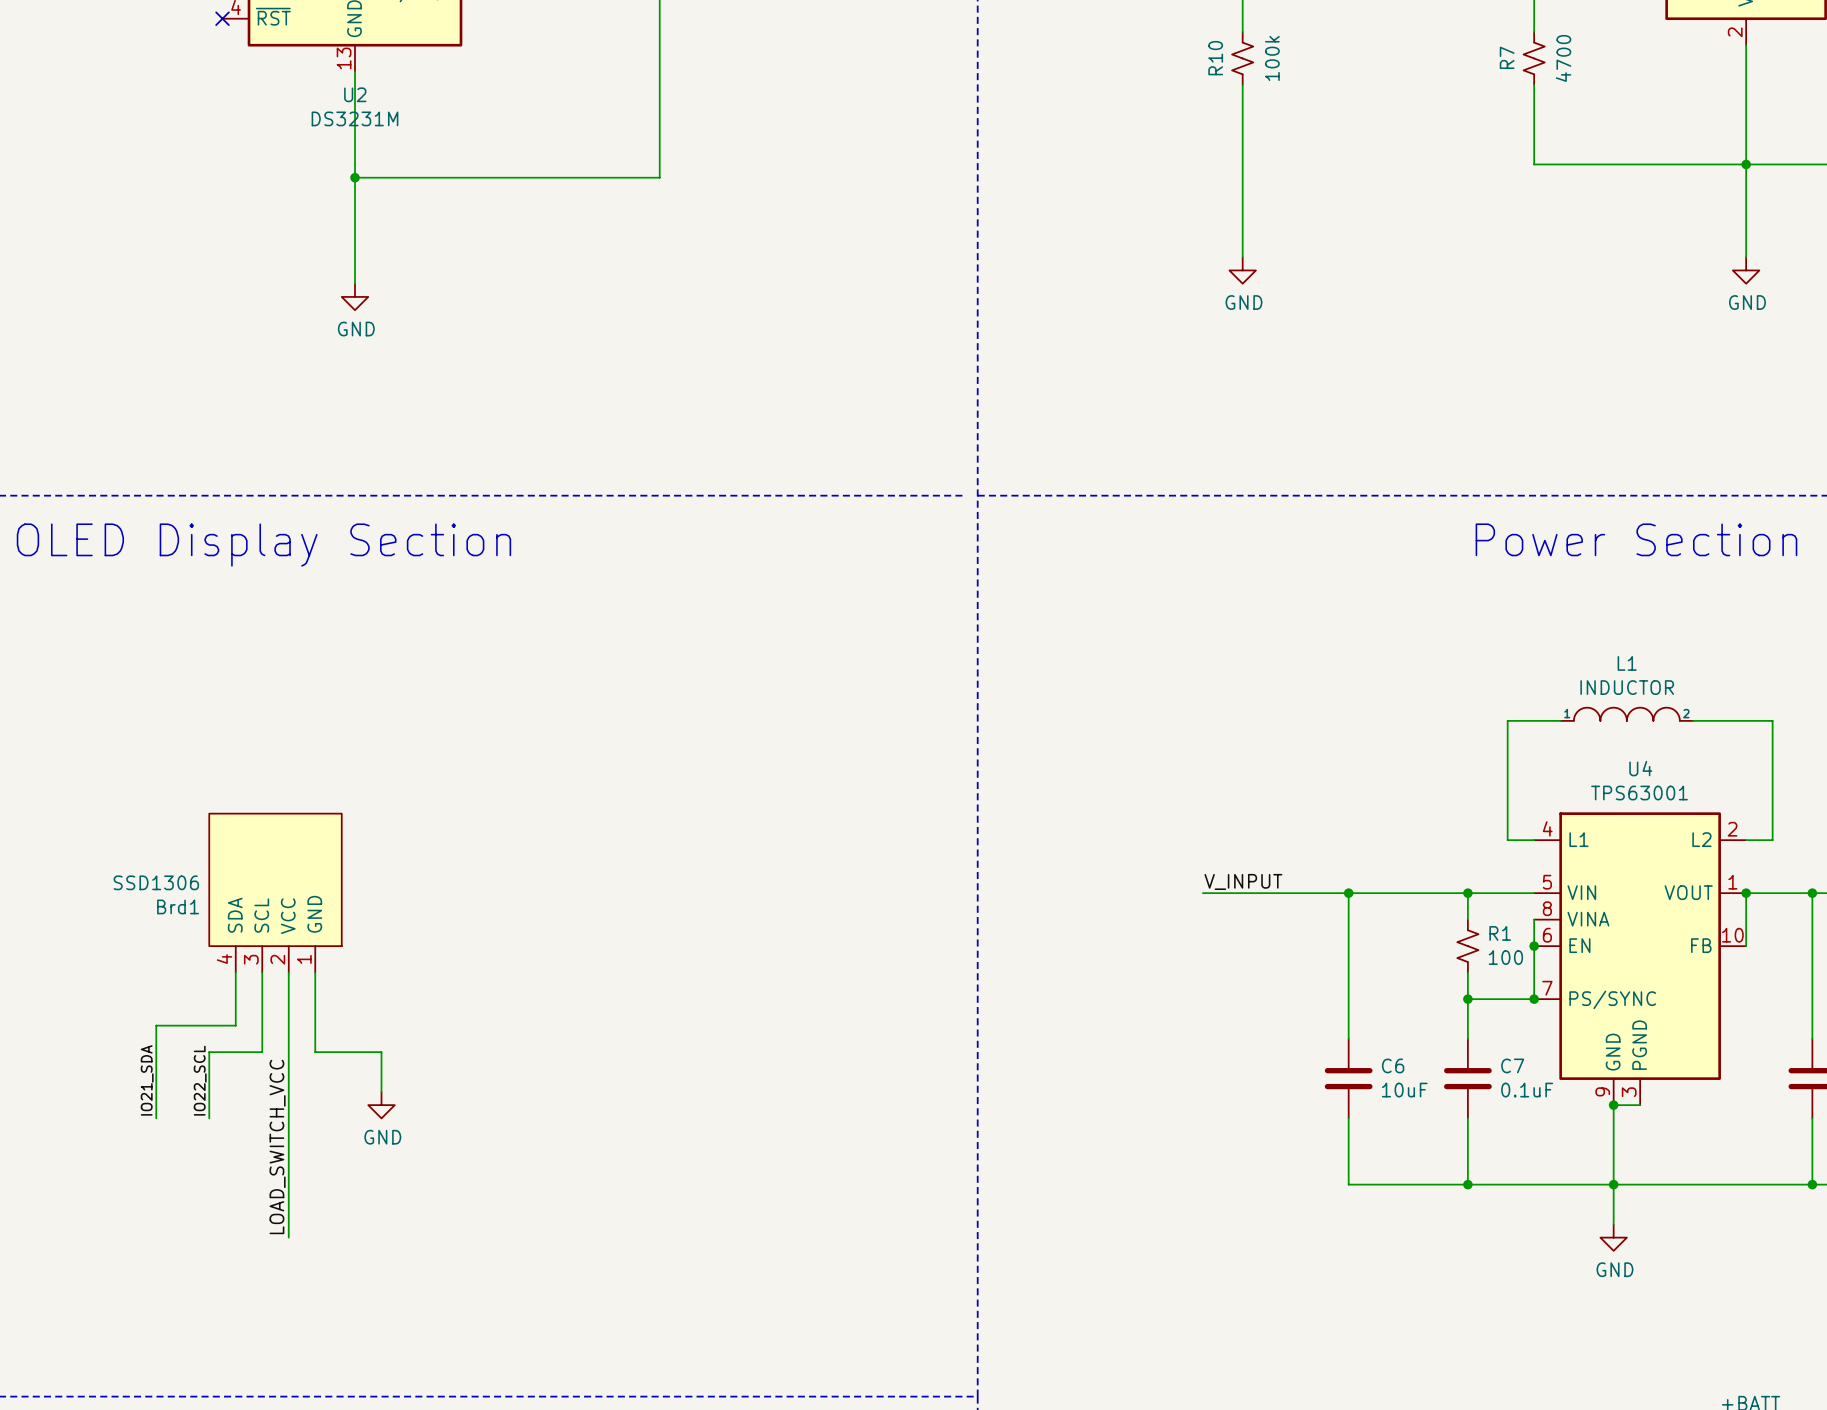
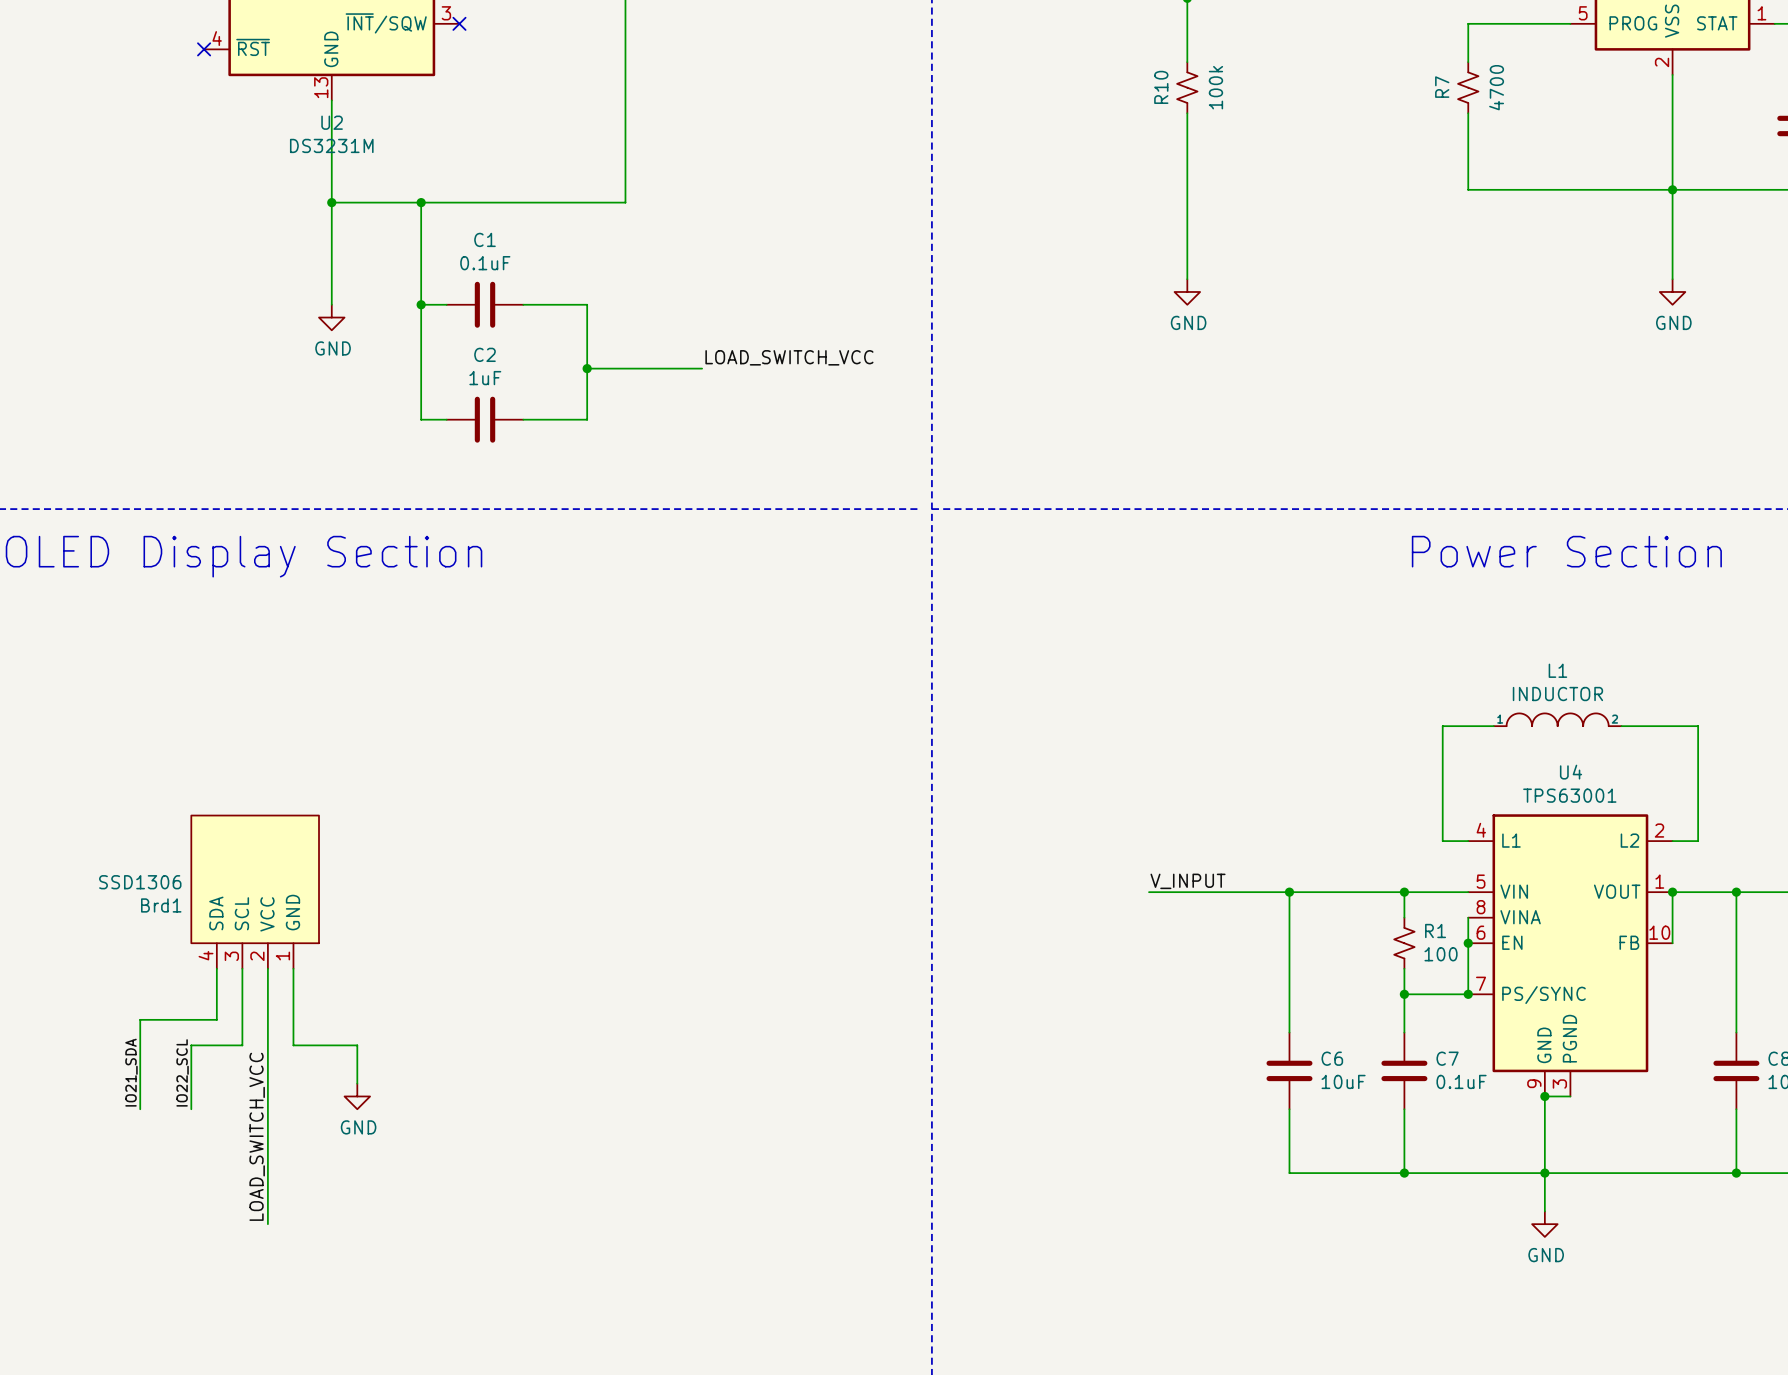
wire: none -> (421, 202) (421, 419) (446, 419)
junction: none -> (421, 202)
wire: none -> (421, 304) (446, 304)
junction: none -> (421, 304)
C1: none -> 0.1uF (485, 304)
wire: none -> (523, 304) (587, 304) (587, 419) (523, 419)
label: none -> LOAD_SWITCH_VCC (789, 357)
wire: none -> (587, 368) (702, 368)
junction: none -> (587, 368)
C2: none -> 1uF (485, 419)

